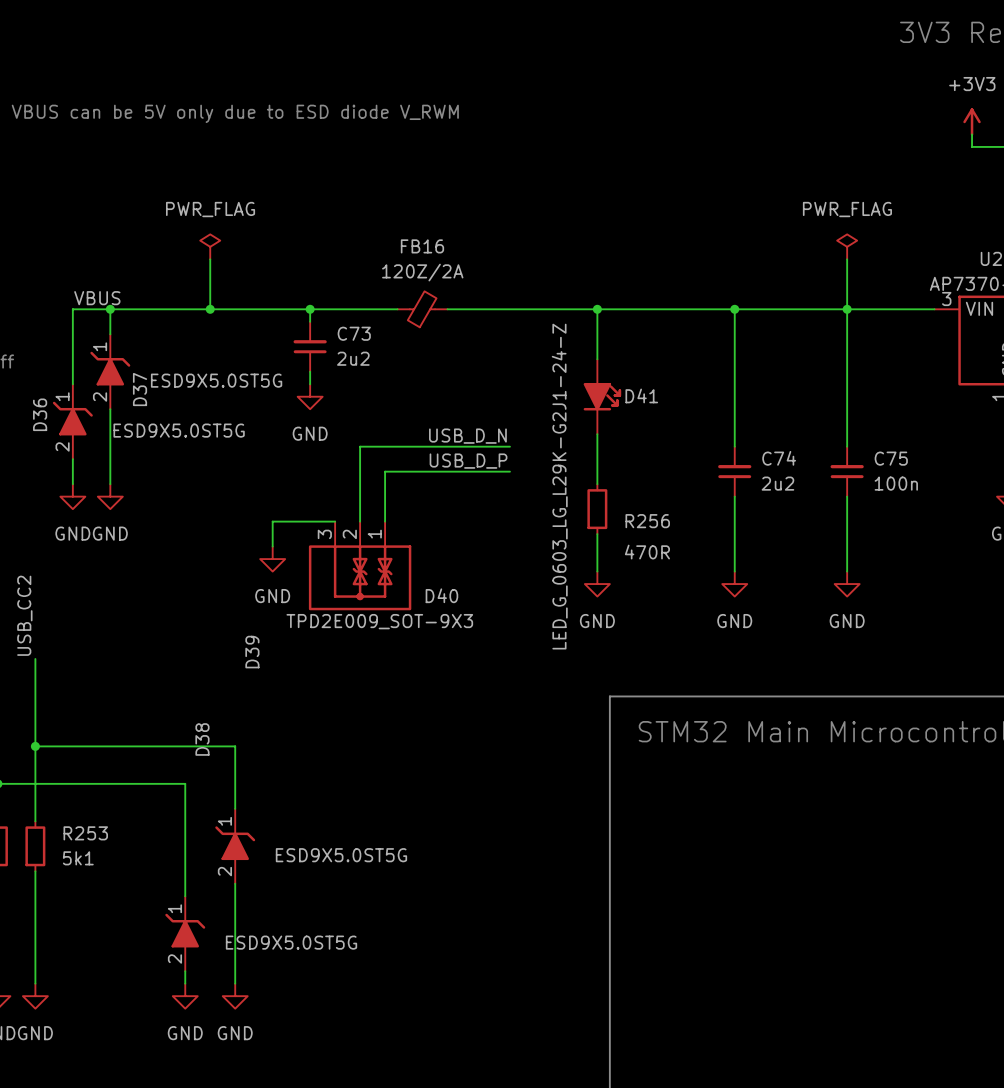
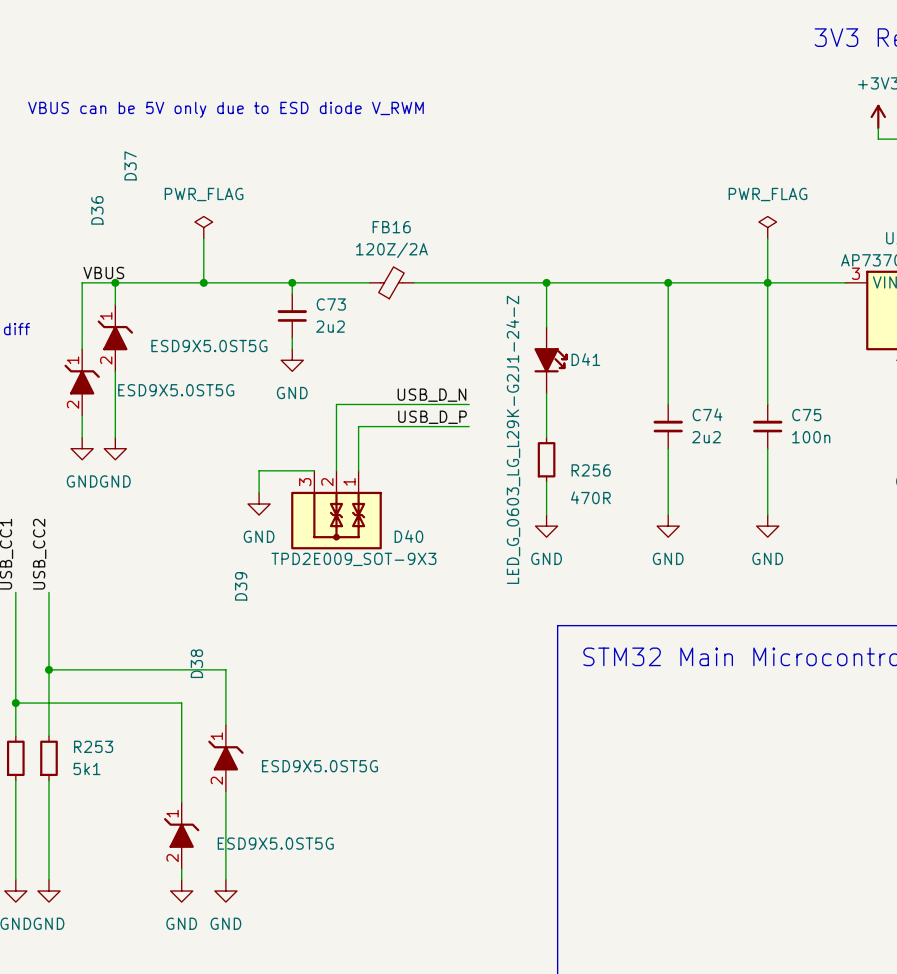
D37 name position: D37 (140, 389) -> D37 (130, 165)
D36 name position: D36 (40, 414) -> D36 (97, 210)

